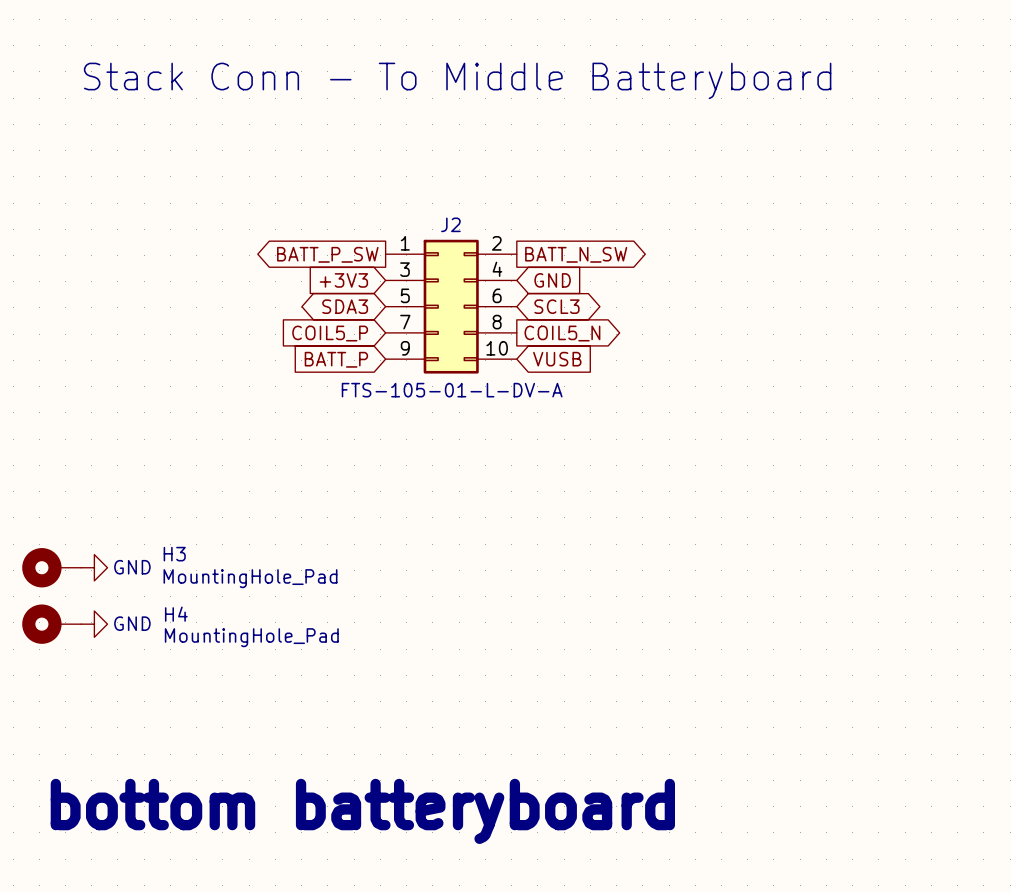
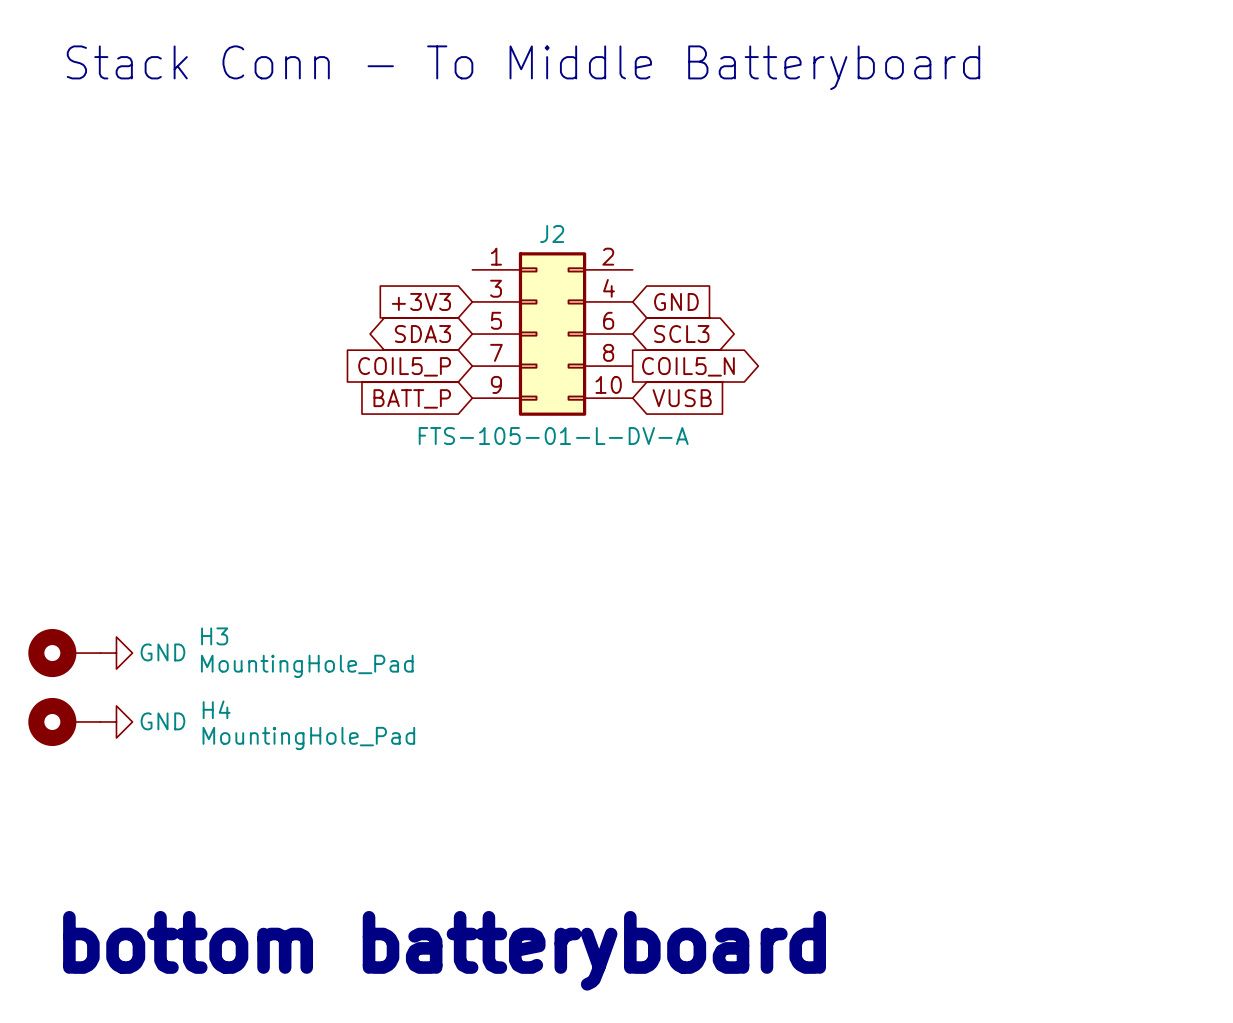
text position: Stack Conn - To Middle Batteryboard (457, 80) -> Stack Conn - To Middle Batteryboard (523, 67)
global label: BATT_P_SW (327, 254) -> none
global label: BATT_N_SW (576, 254) -> none

